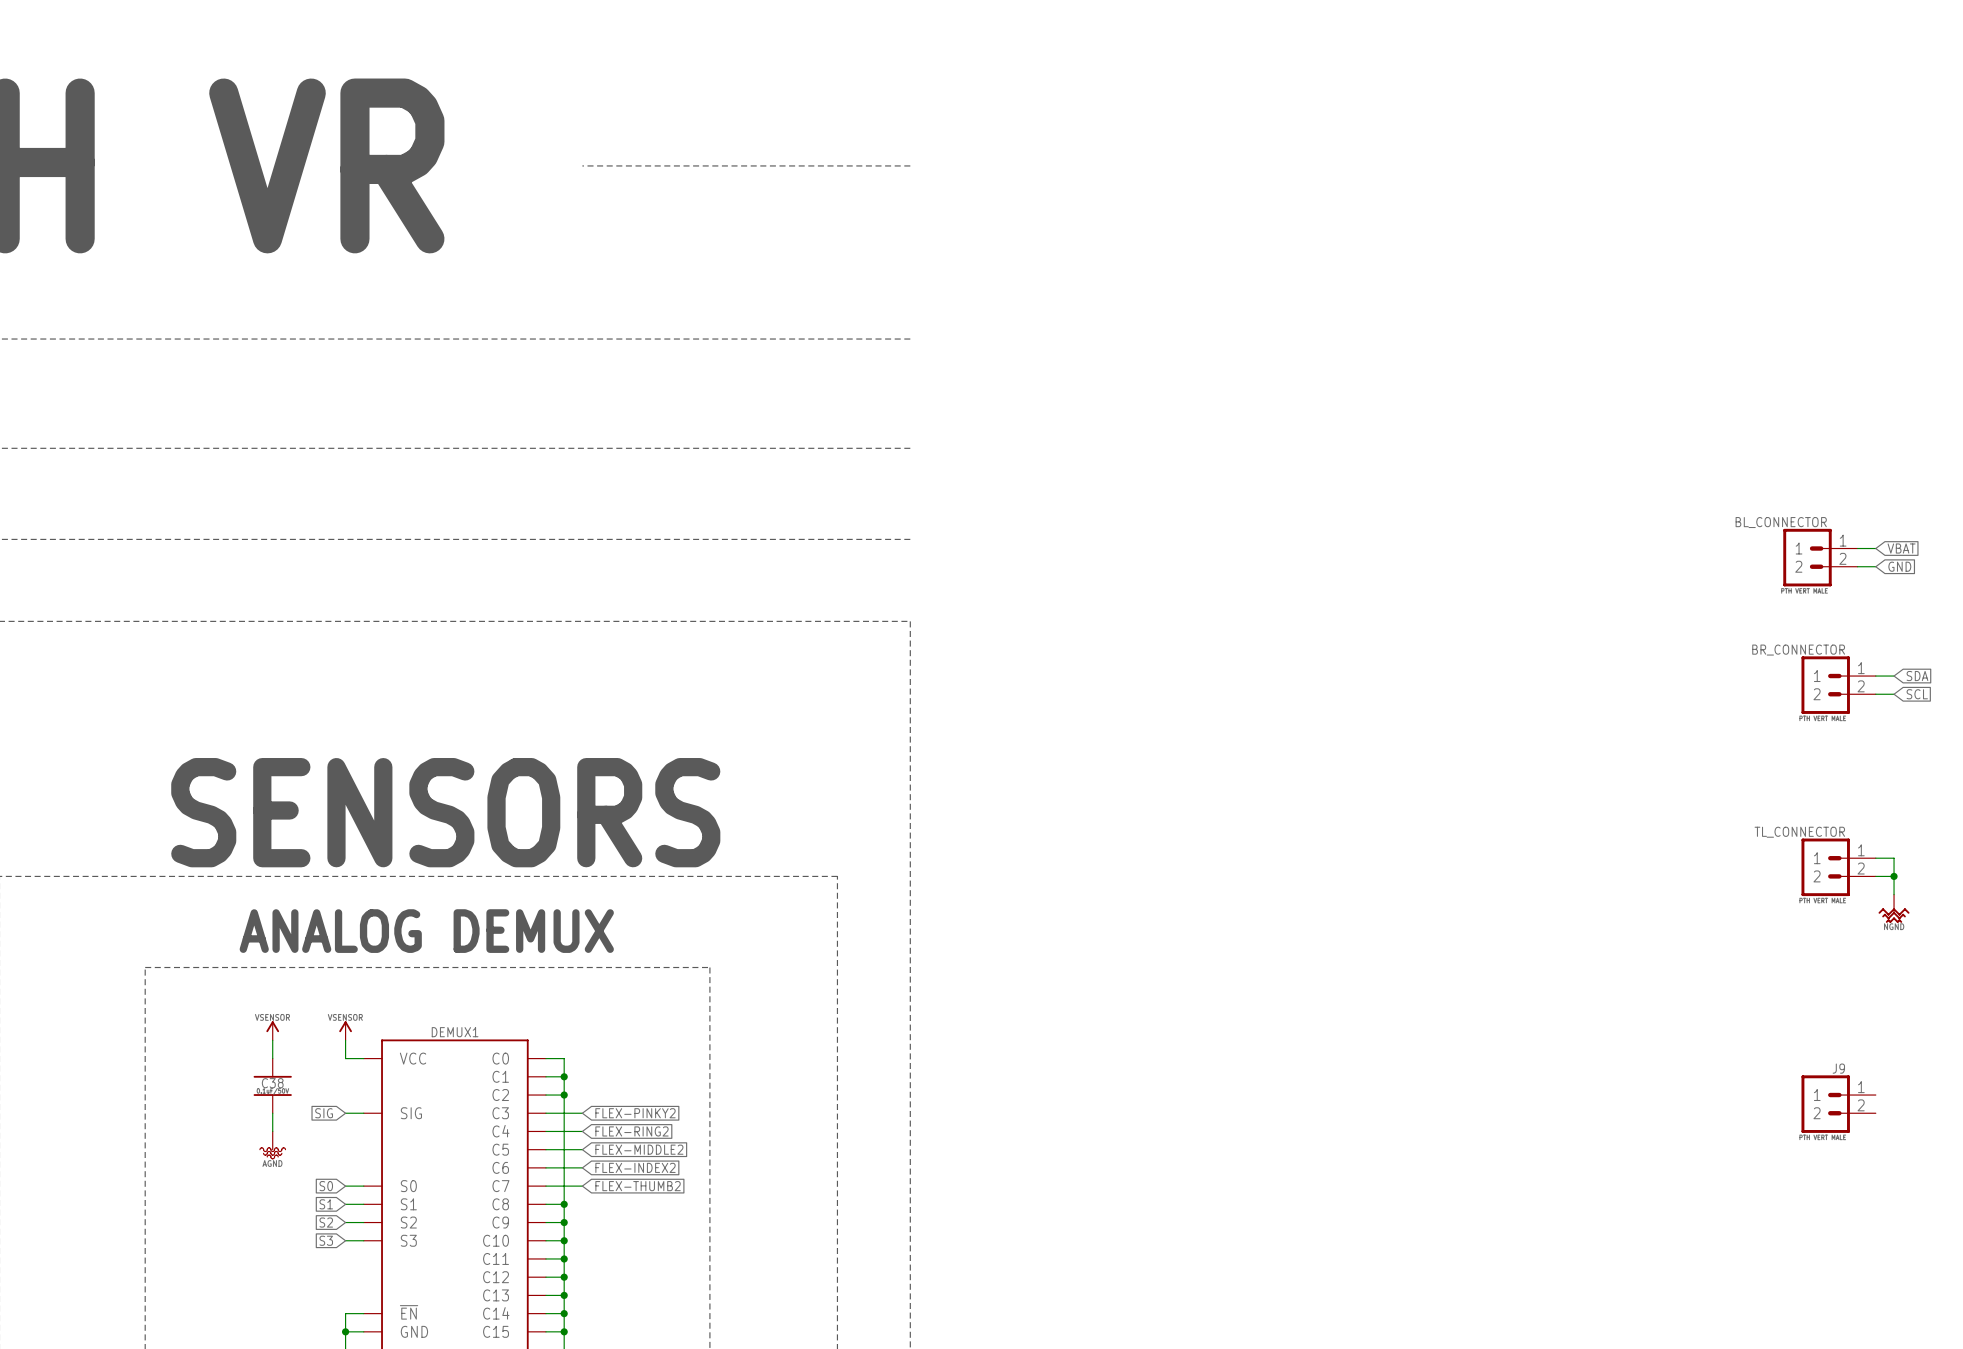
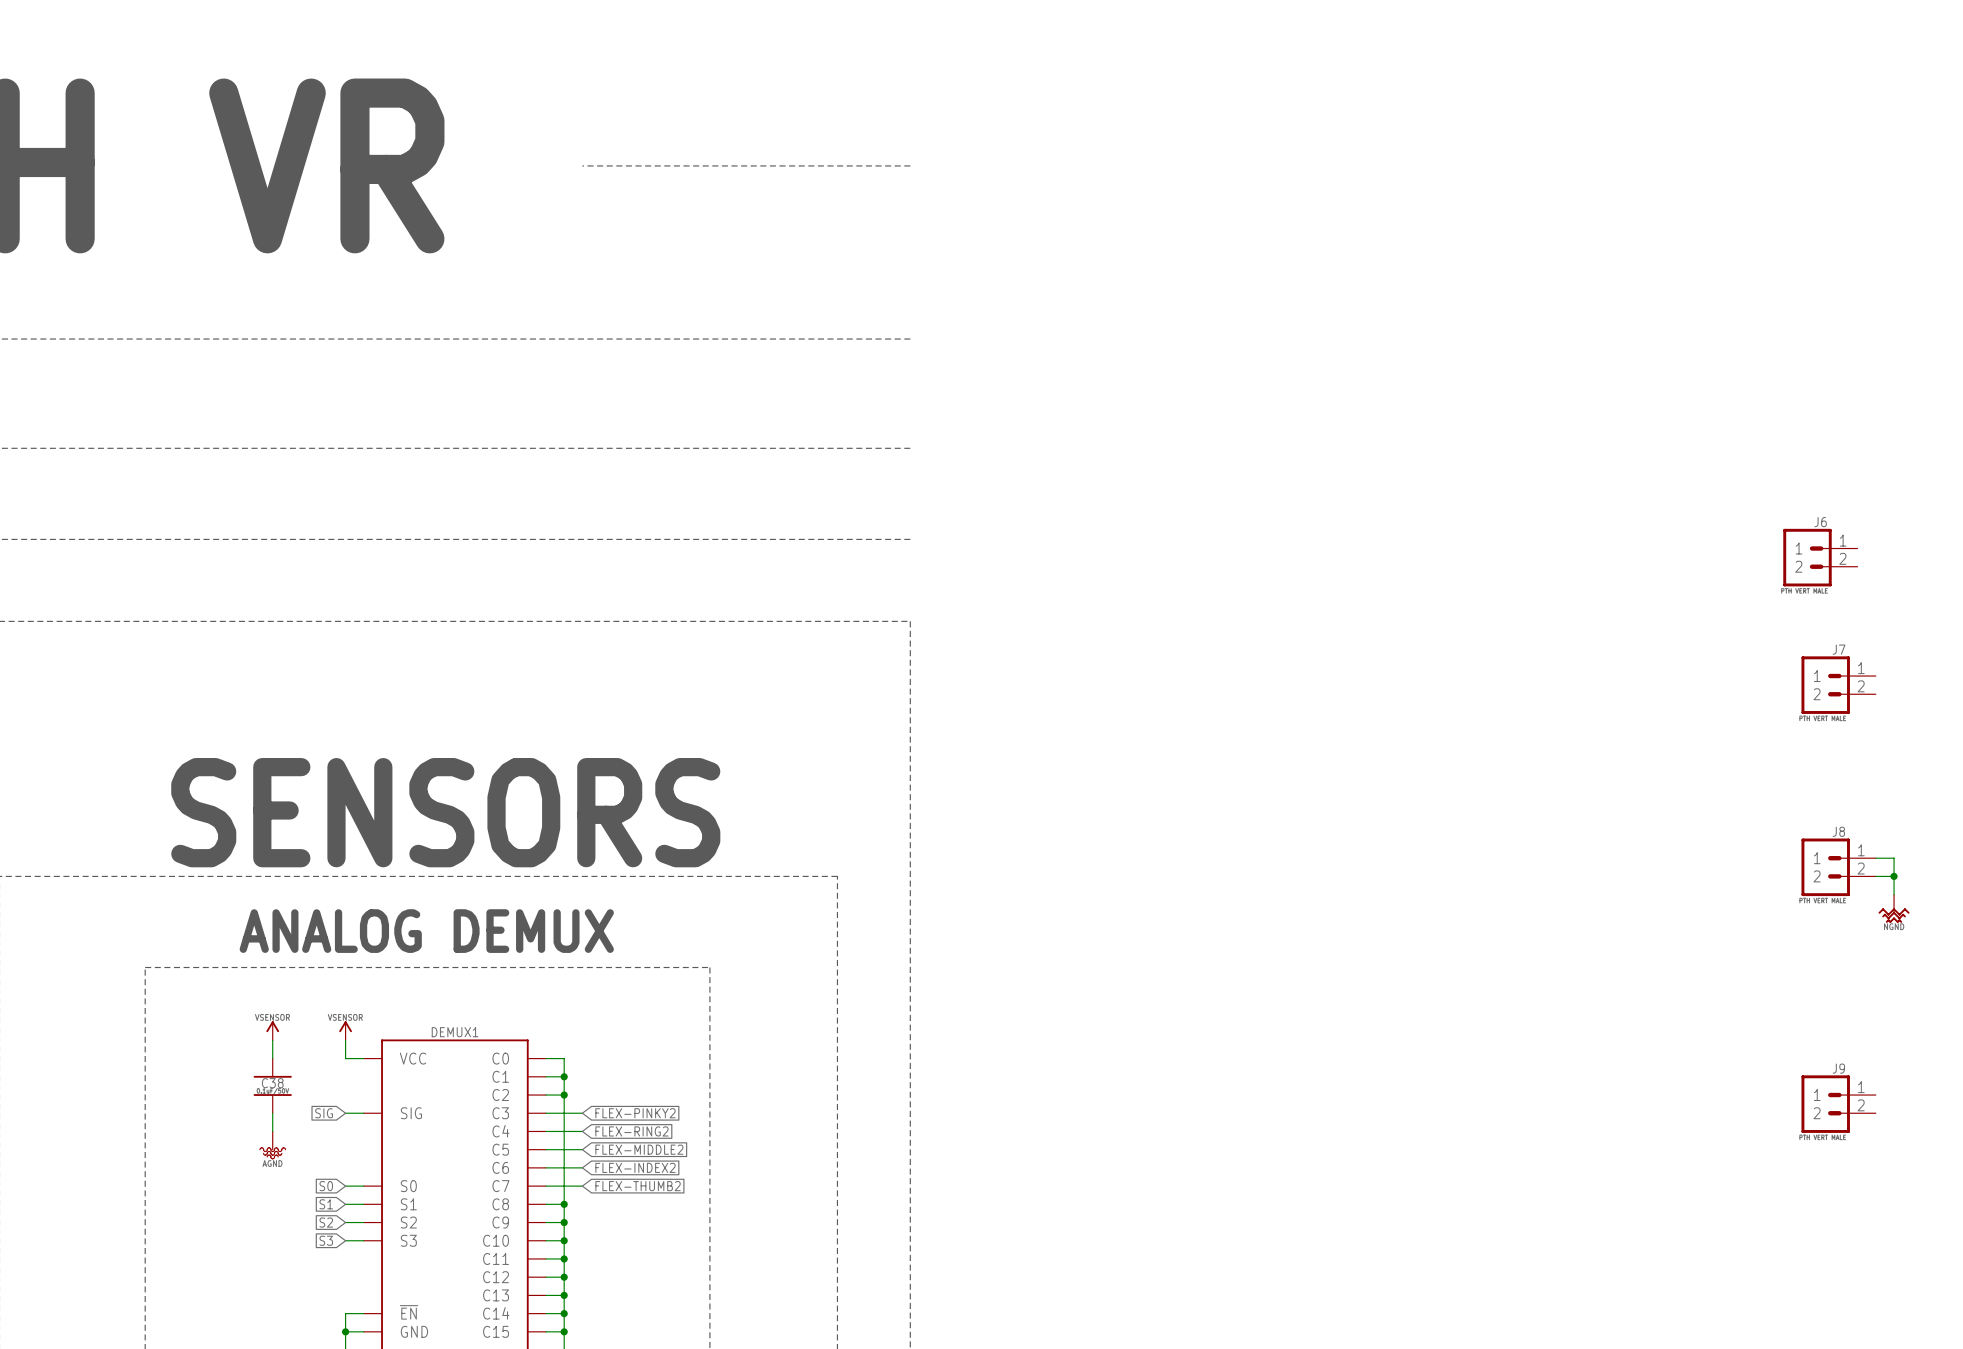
BL_CONNECTOR name: BL_CONNECTOR (1781, 522) -> J6 (1820, 522)
wire: (1857, 548) (1875, 548) -> none
global label: VBAT (1901, 548) -> none
wire: (1857, 566) (1875, 566) -> none
global label: GND (1899, 566) -> none
BR_CONNECTOR name: BR_CONNECTOR (1798, 650) -> J7 (1839, 649)
wire: (1875, 676) (1894, 676) -> none
global label: SDA (1917, 676) -> none
wire: (1875, 694) (1894, 694) -> none
global label: SCL (1917, 694) -> none
TL_CONNECTOR name: TL_CONNECTOR (1799, 832) -> J8 (1838, 831)

